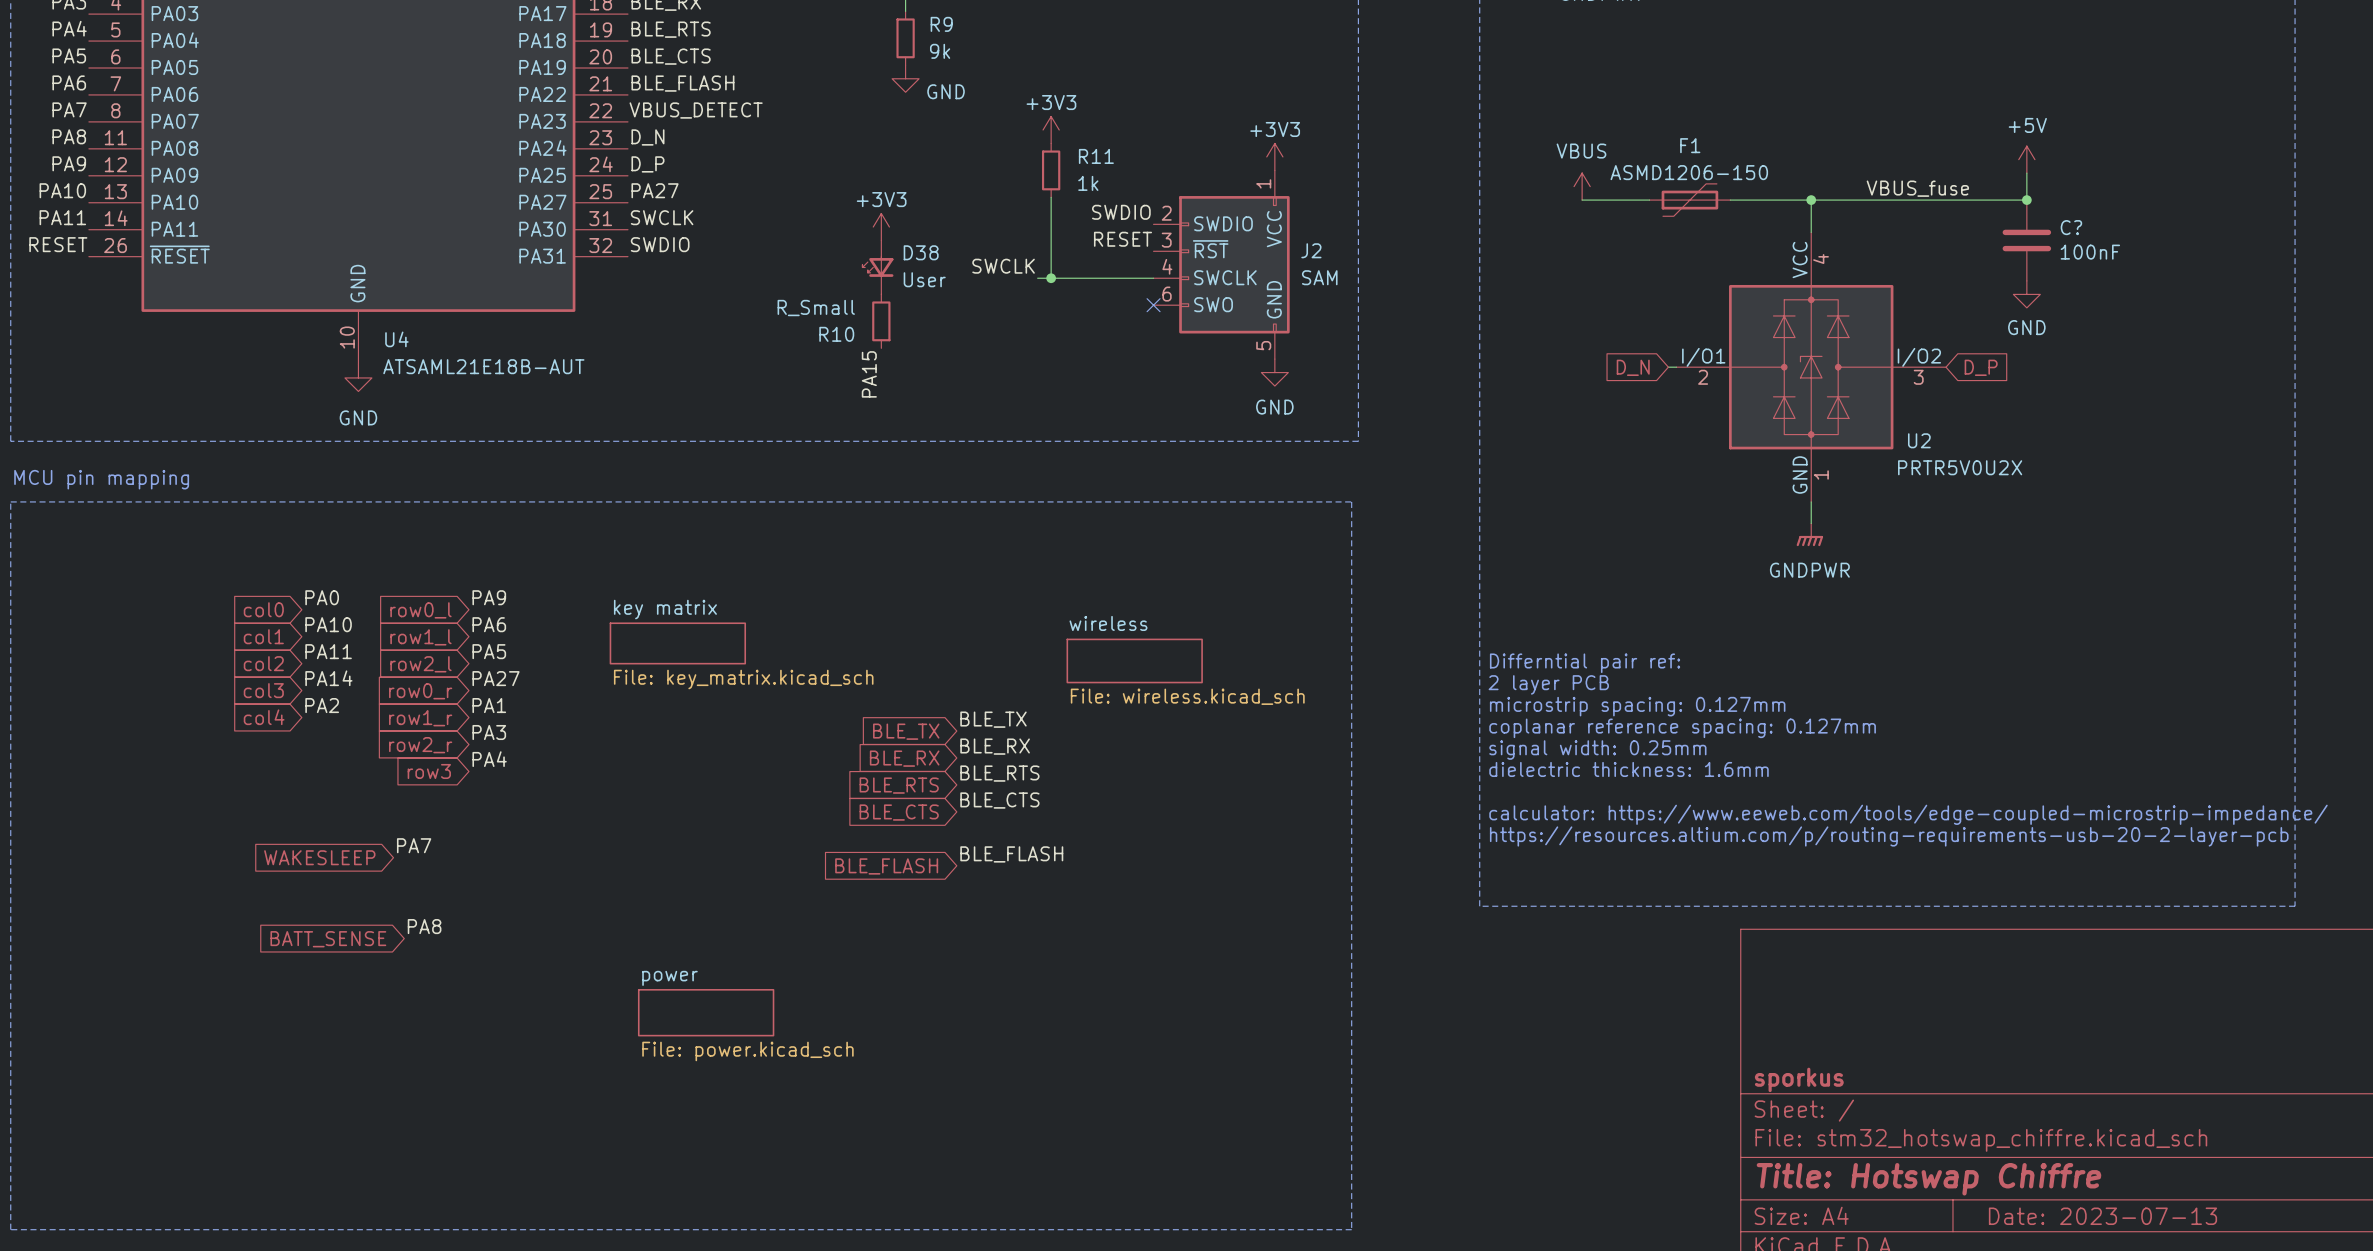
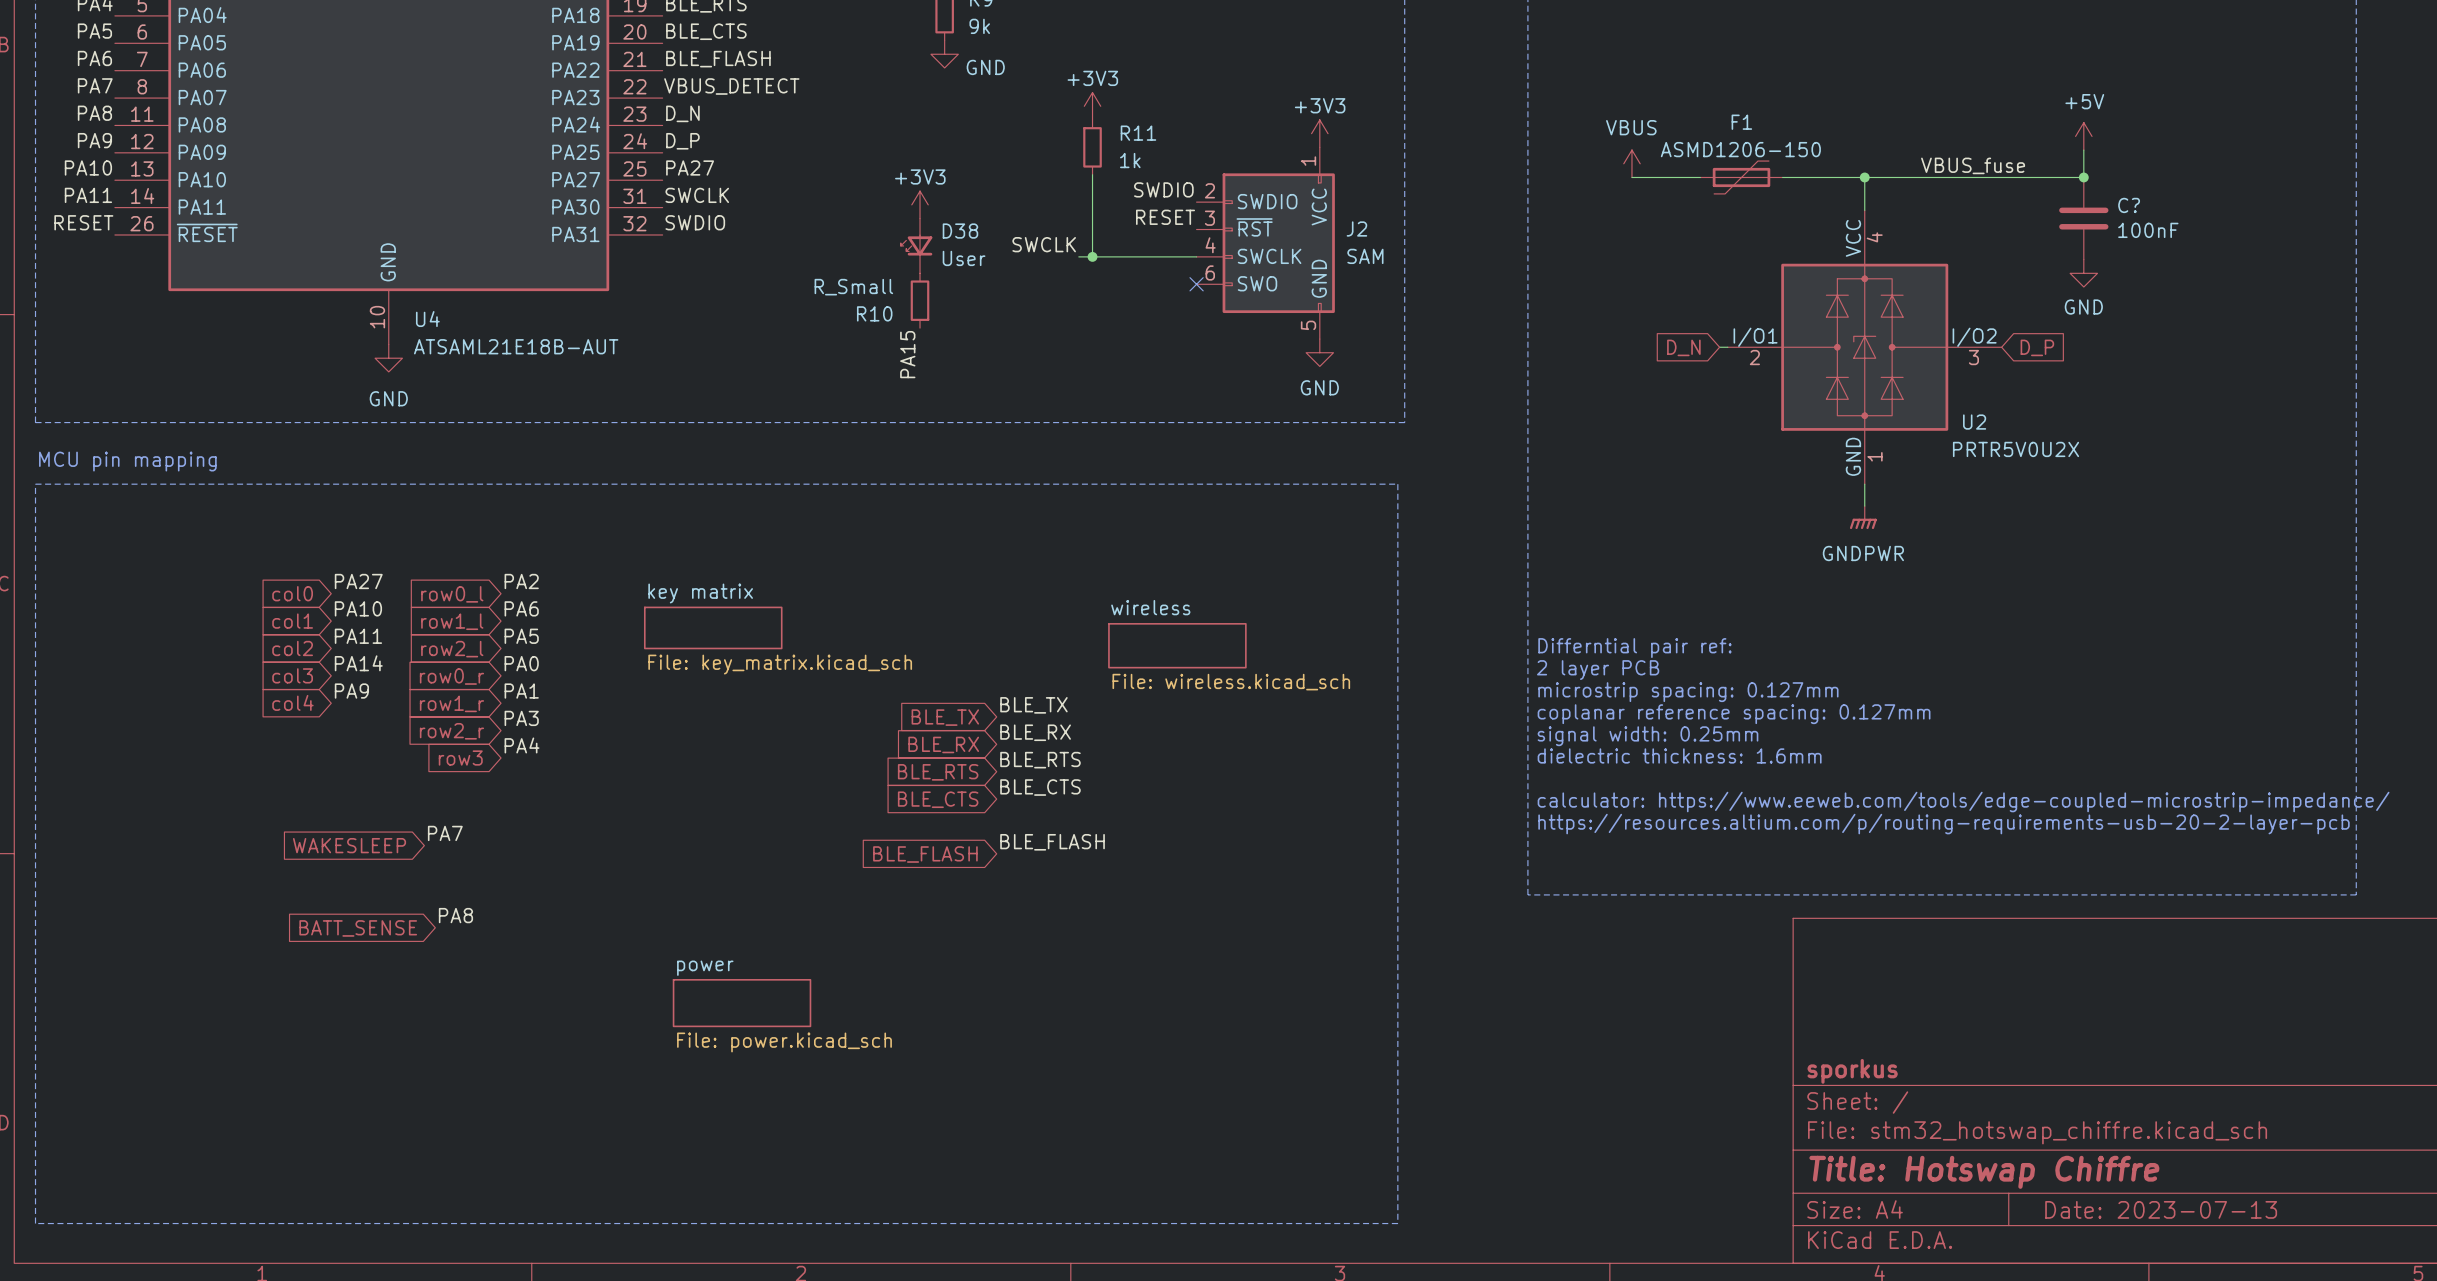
label: PA0 (322, 597) -> PA27 (358, 581)
label: PA9 (489, 597) -> PA2 (521, 581)
label: PA27 (496, 678) -> PA0 (521, 663)
label: PA2 (322, 705) -> PA9 (351, 691)

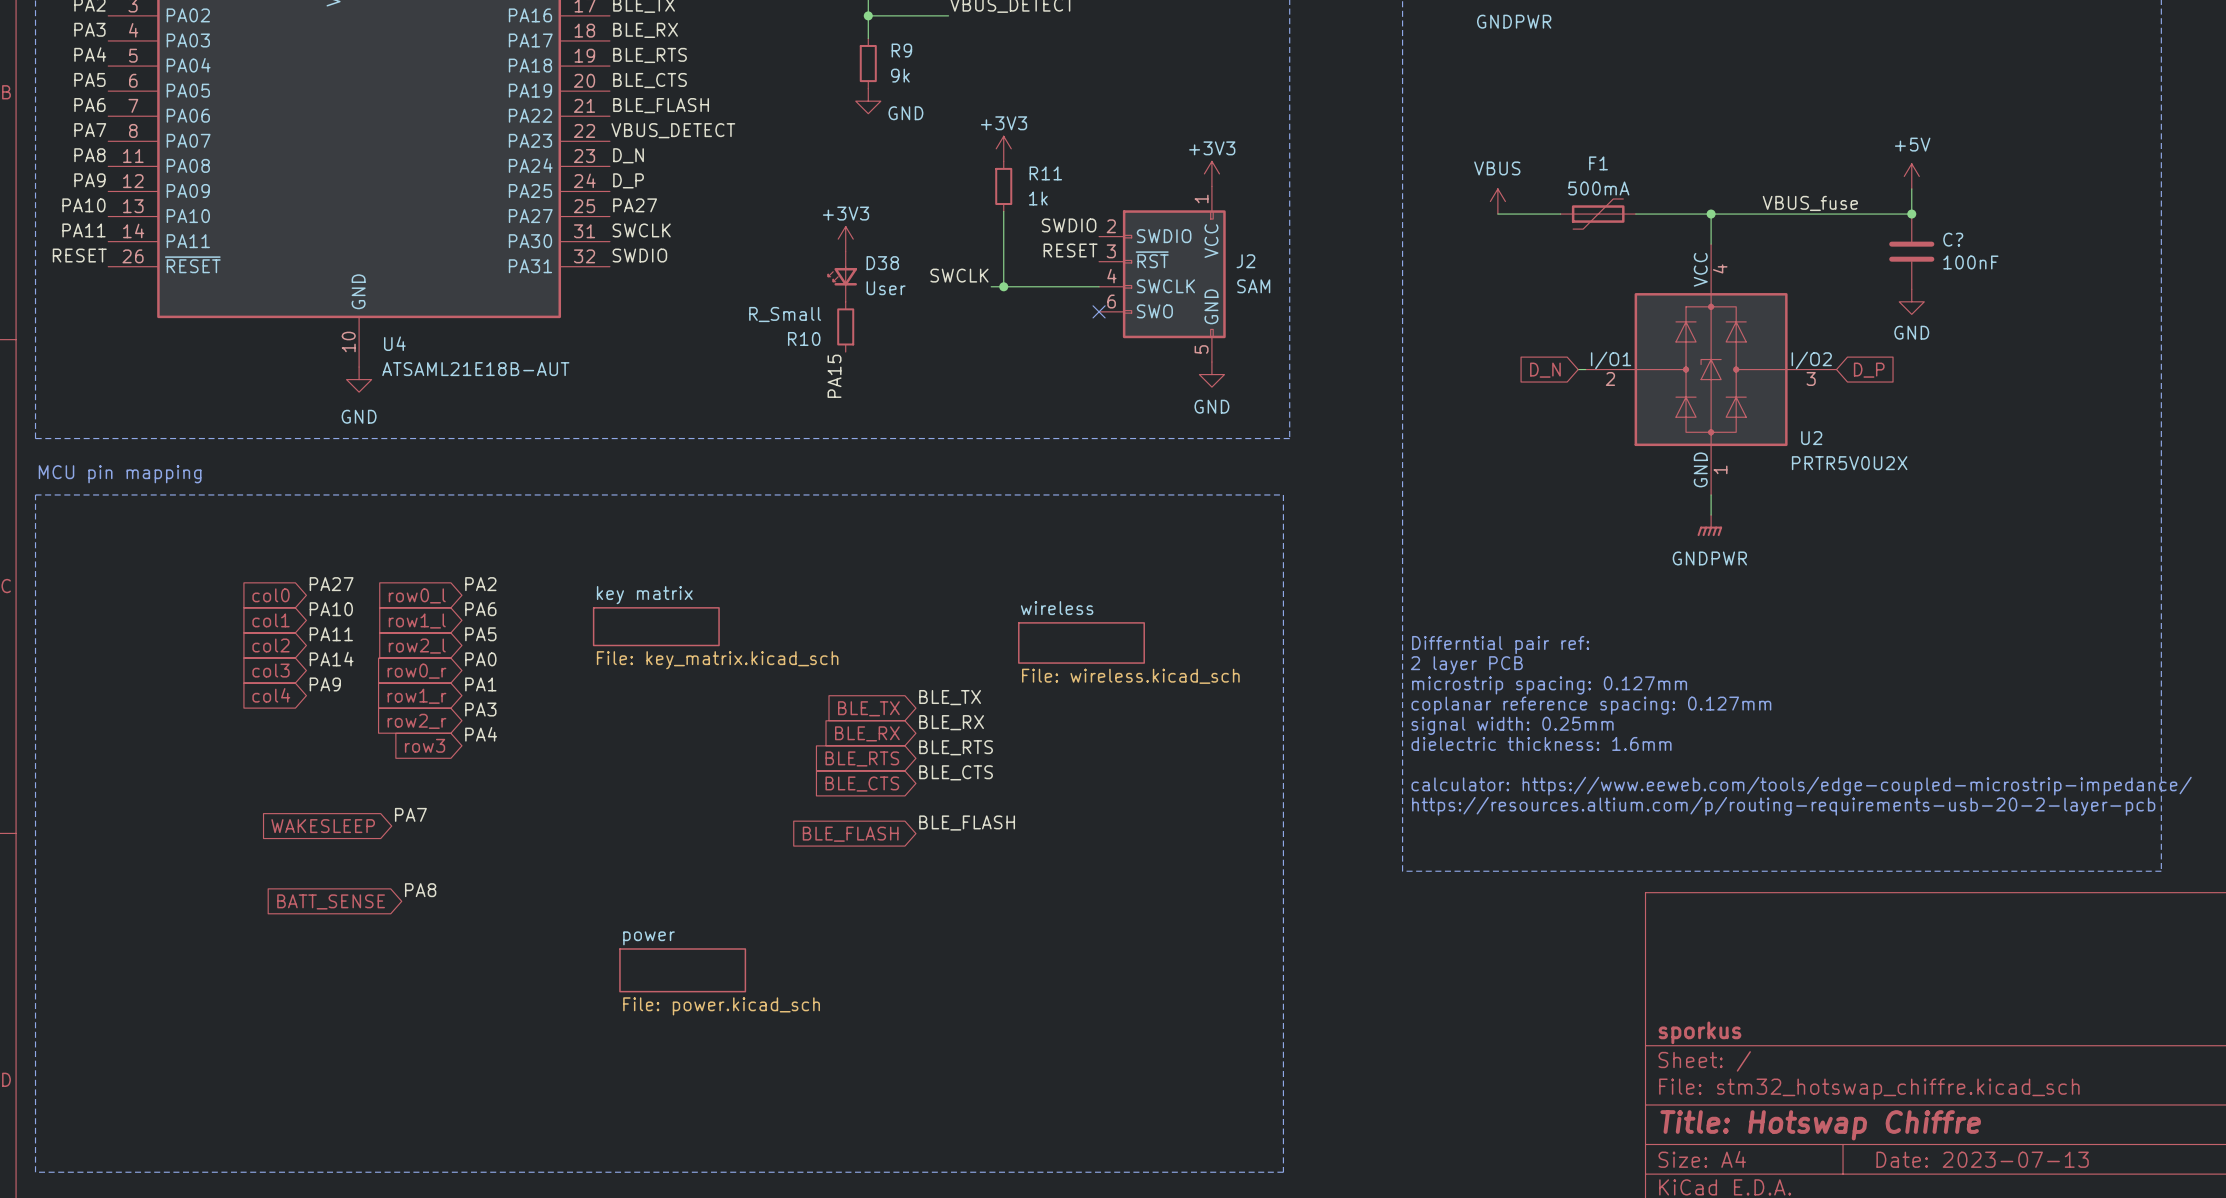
F1 value: ASMD1206-150 (1740, 149) -> 500mA (1598, 188)

